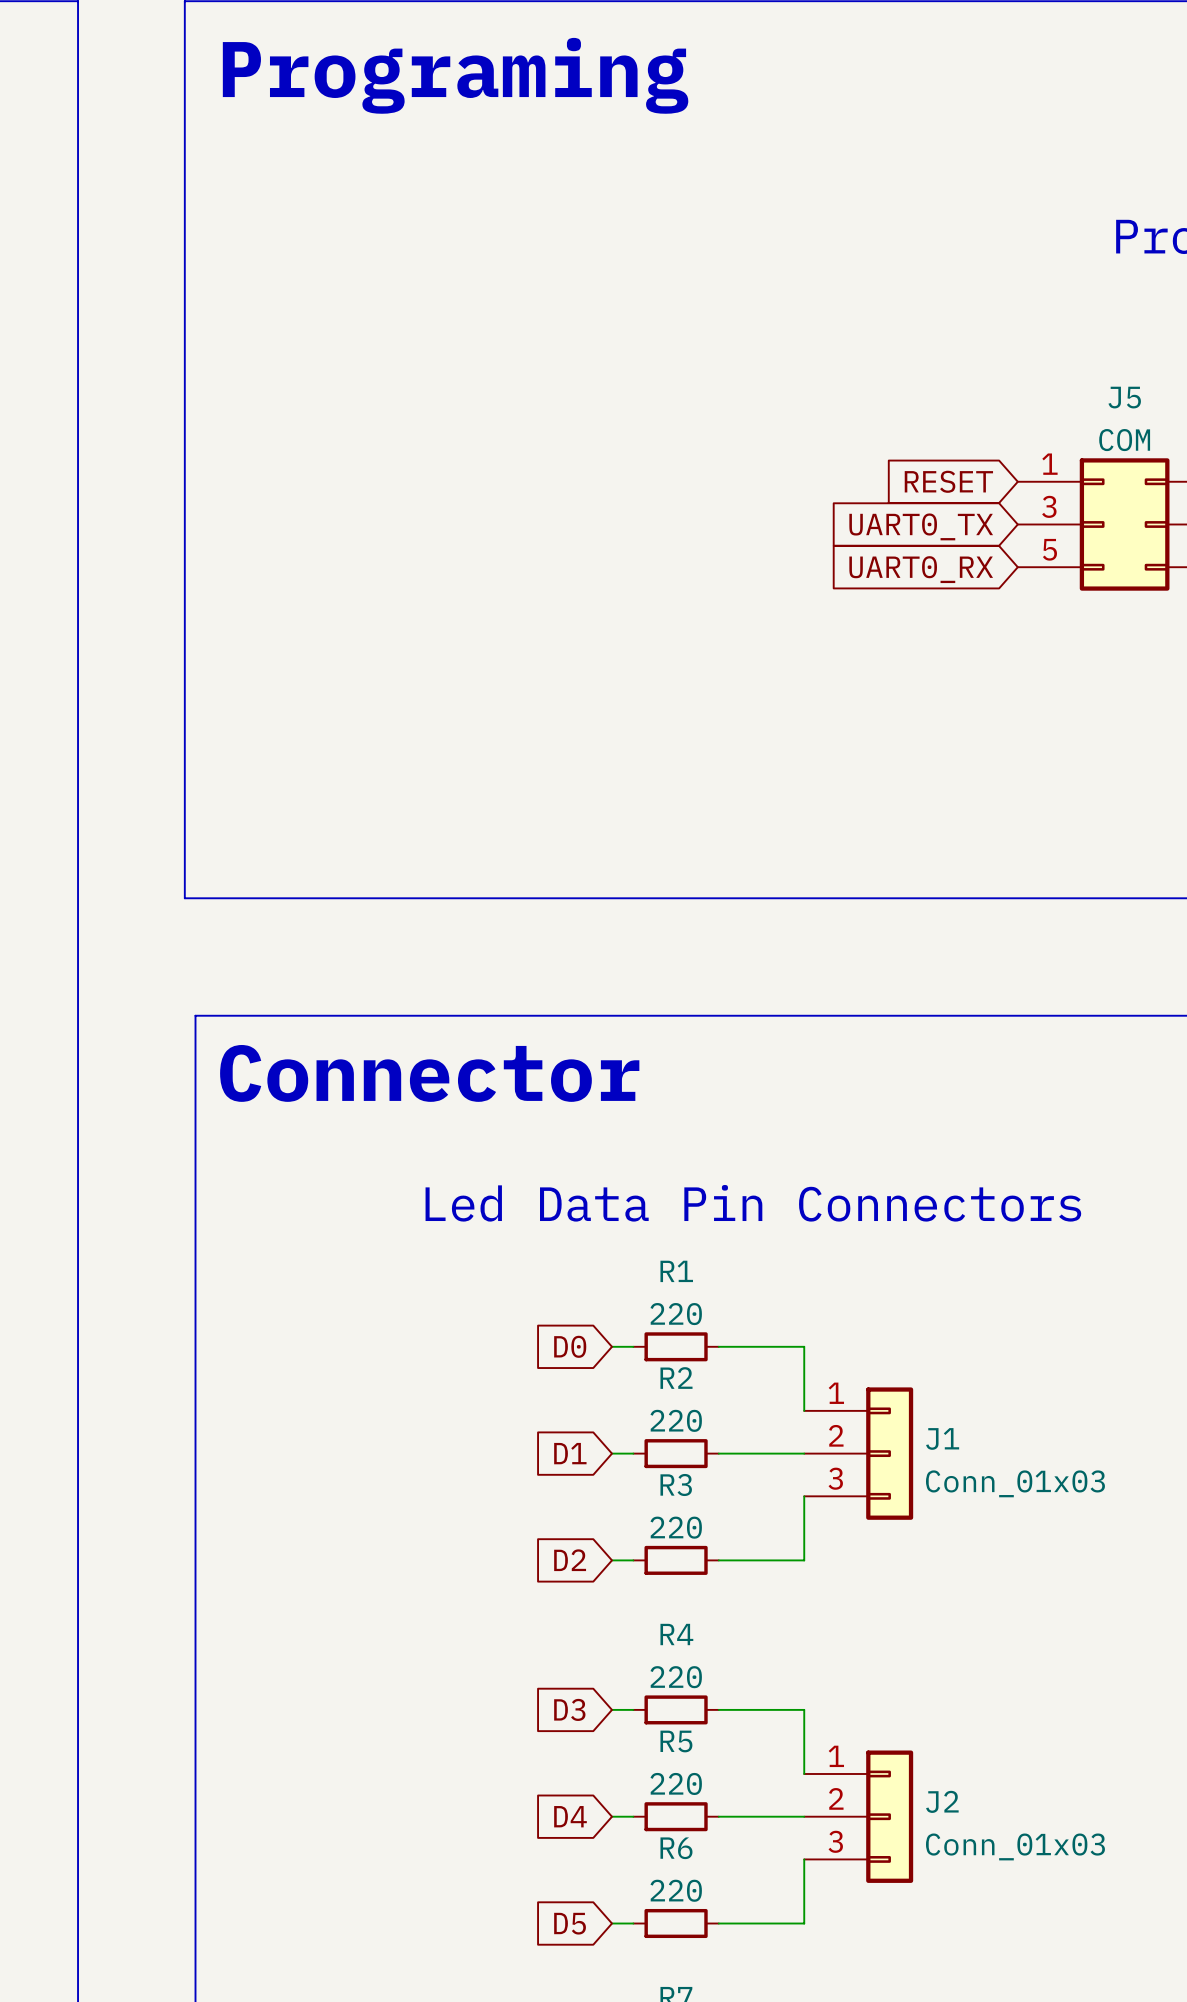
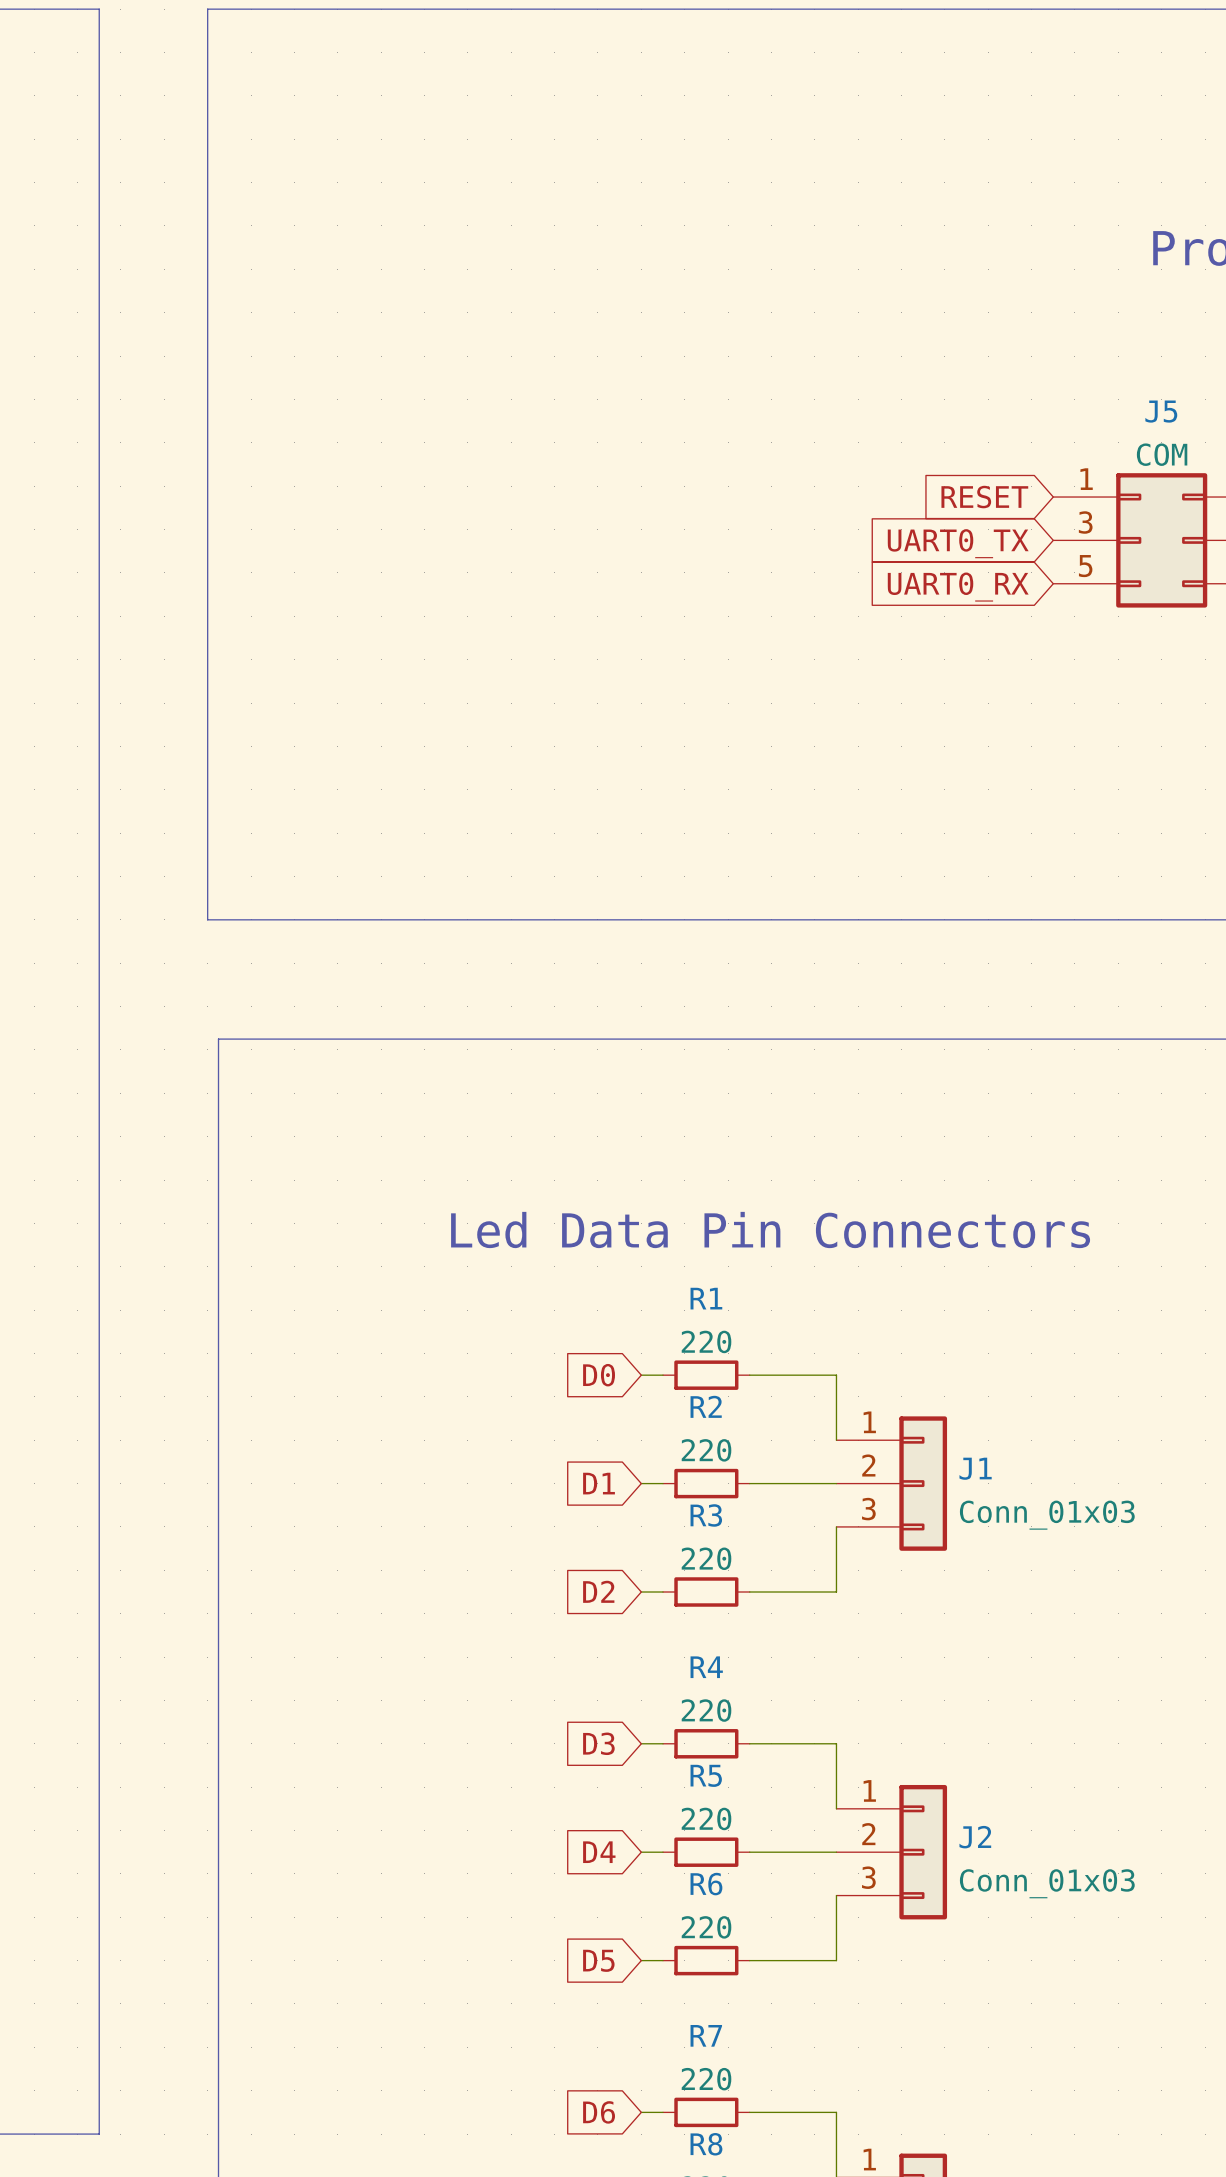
text: Programing (455, 75) -> none
text: Connector (429, 1073) -> none

